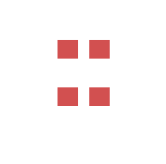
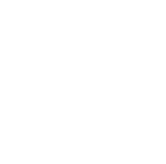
part: (83, 49) -> none
part: (83, 96) -> none

